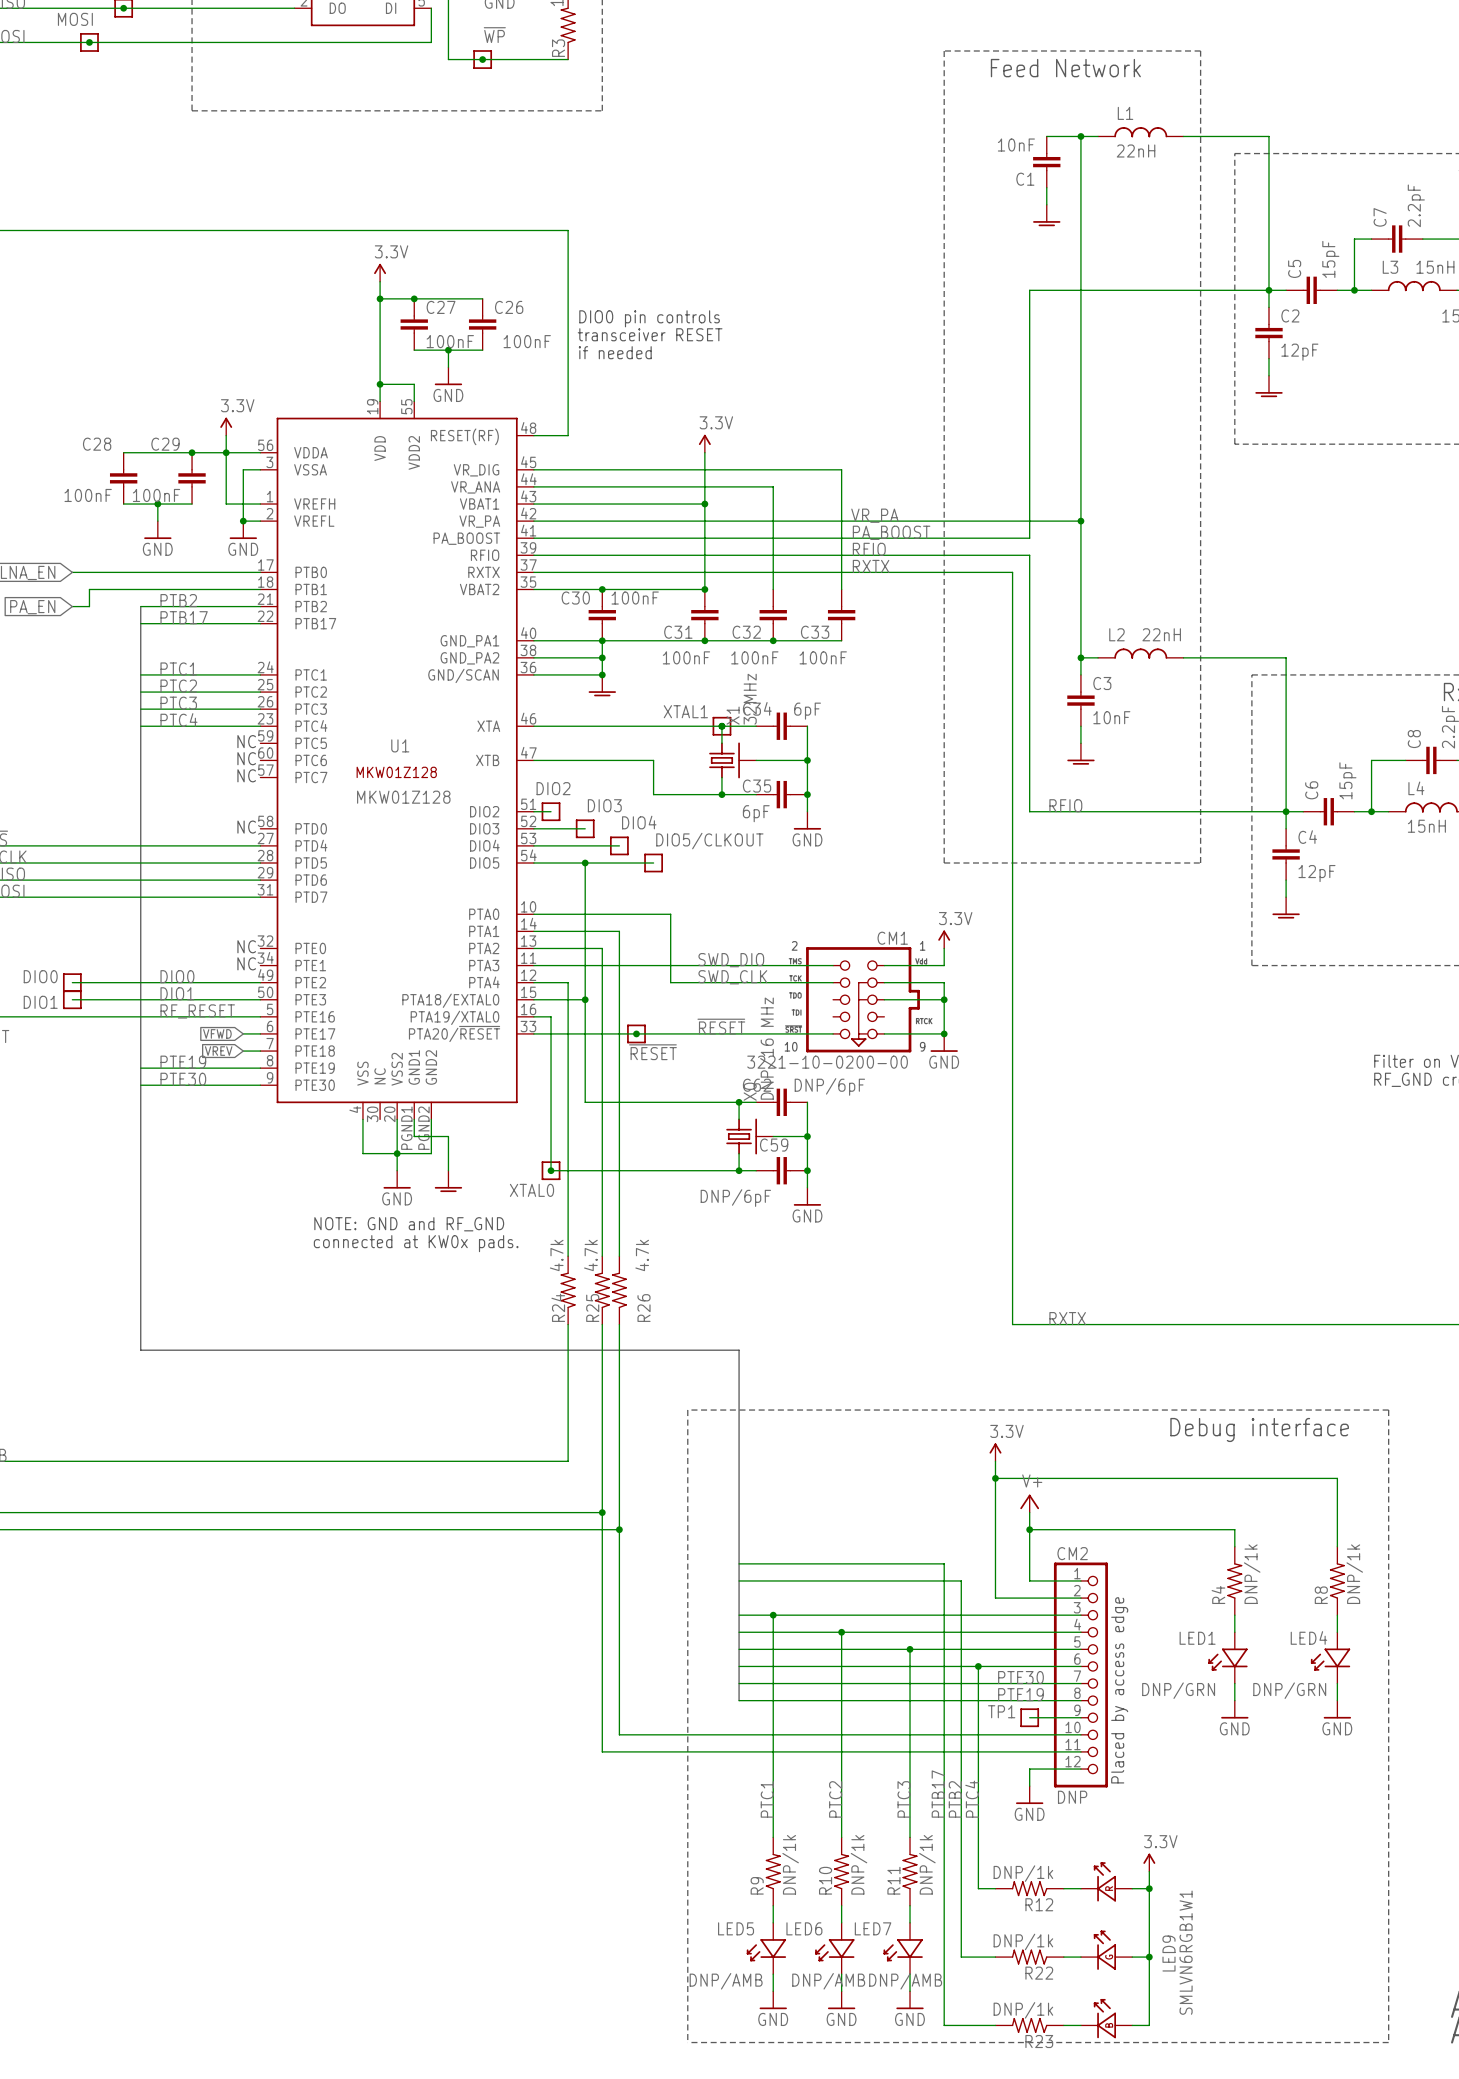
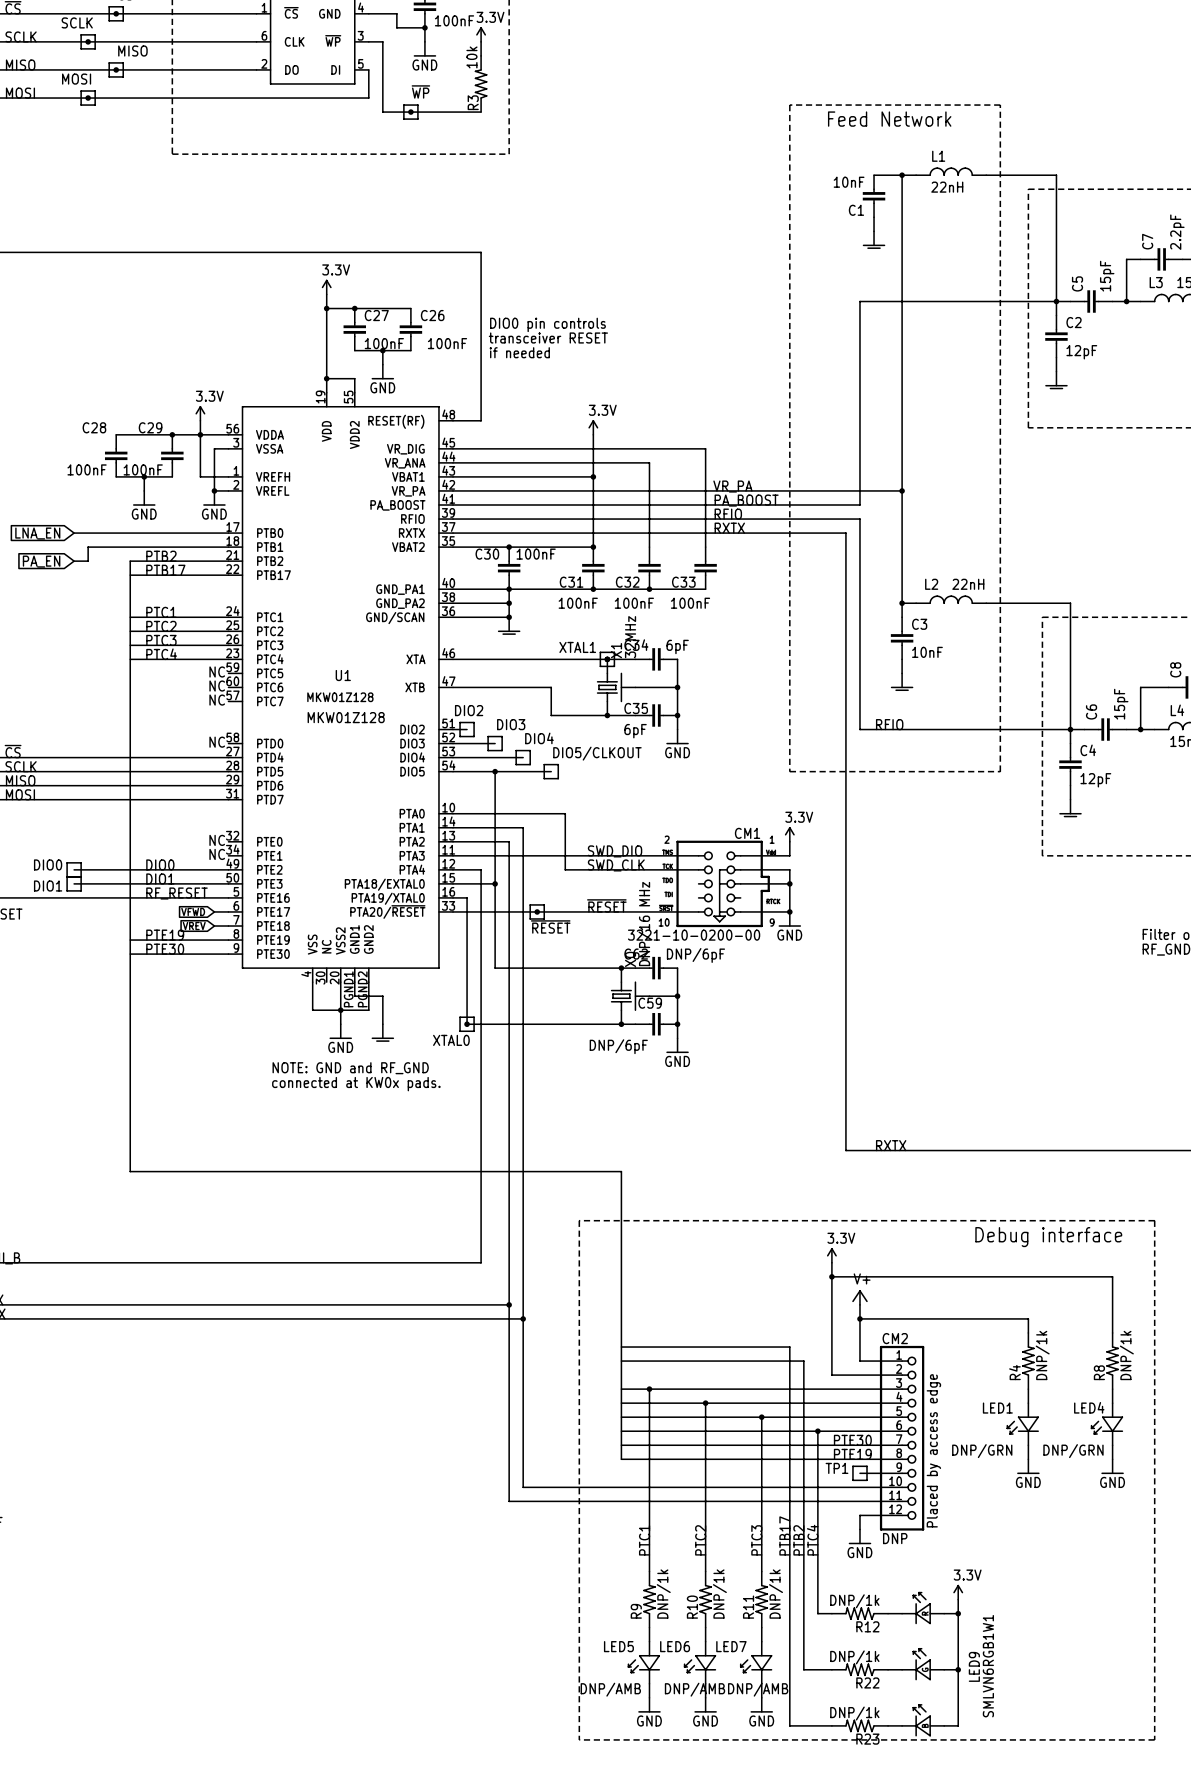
R24: 4.7k (568, 1290) -> none
R25: 4.7k (602, 1290) -> none
R26: 4.7k (619, 1290) -> none

